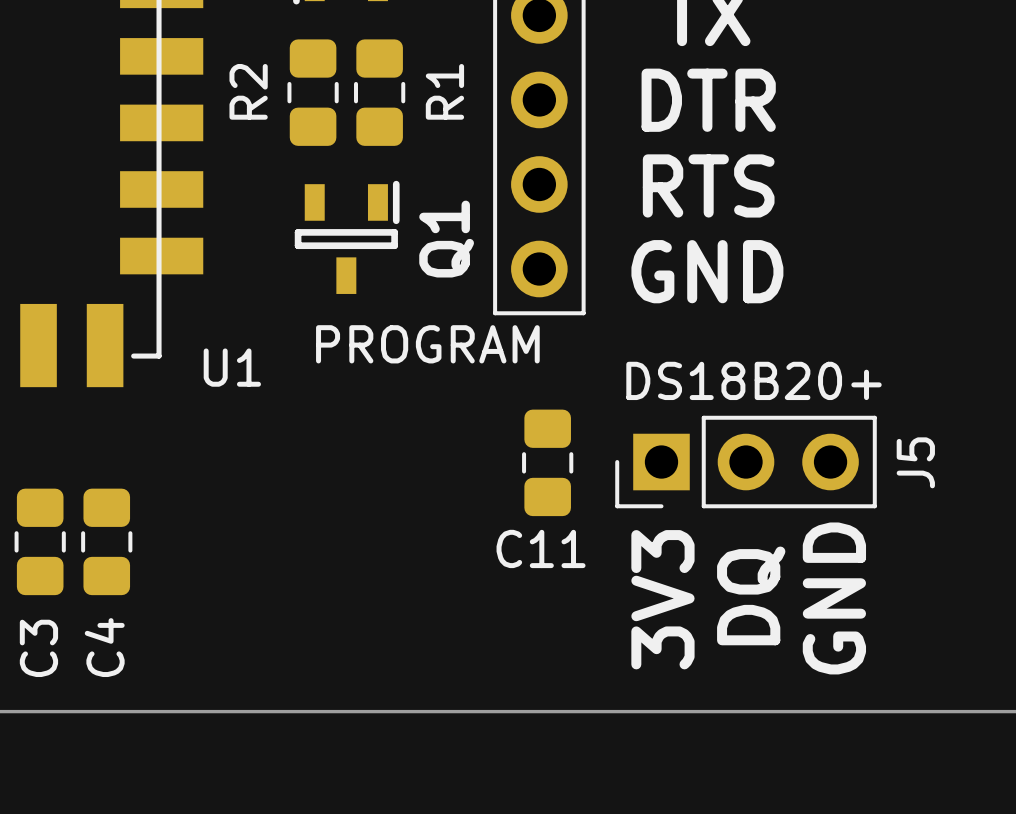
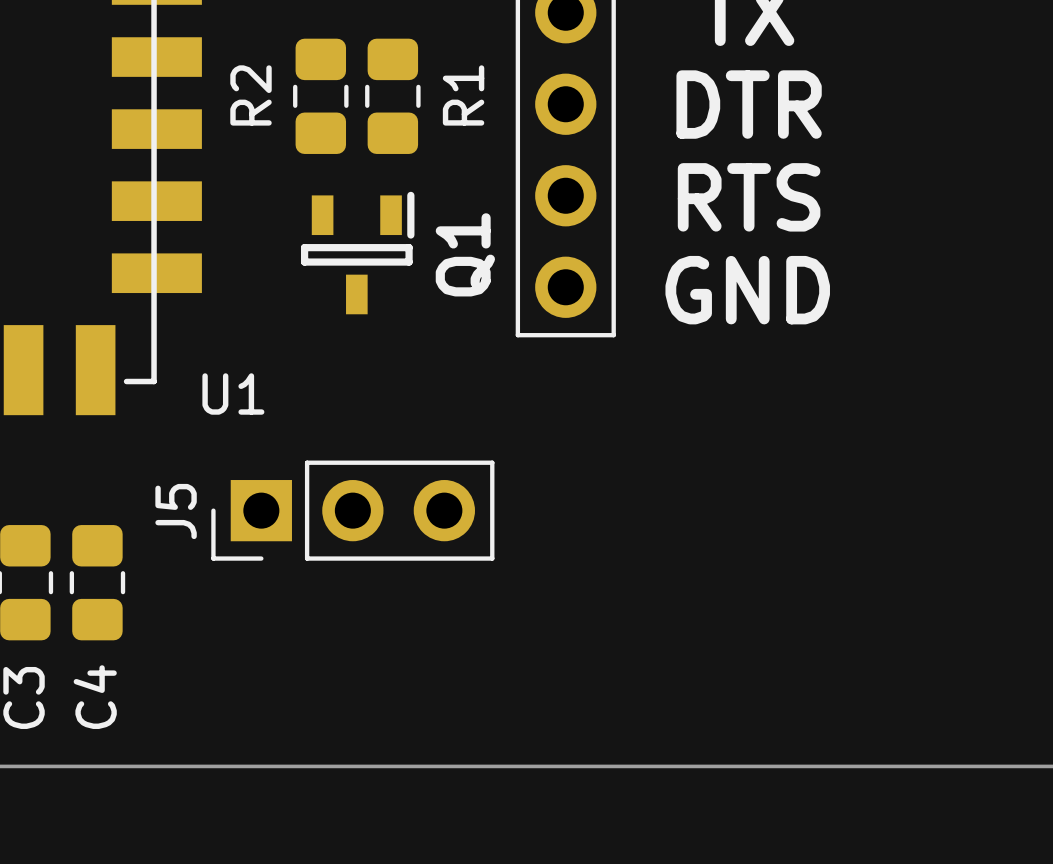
text: PROGRAM (427, 344) -> none
text: DS18B20+ (754, 380) -> none
C11: (547, 462) -> none
J5 position: (746, 462) -> (352, 510)
J5 name position: J5 (915, 462) -> J5 (176, 511)
text: DQ (751, 595) -> none
text: GND (834, 598) -> none
text: 3V3 (662, 599) -> none

